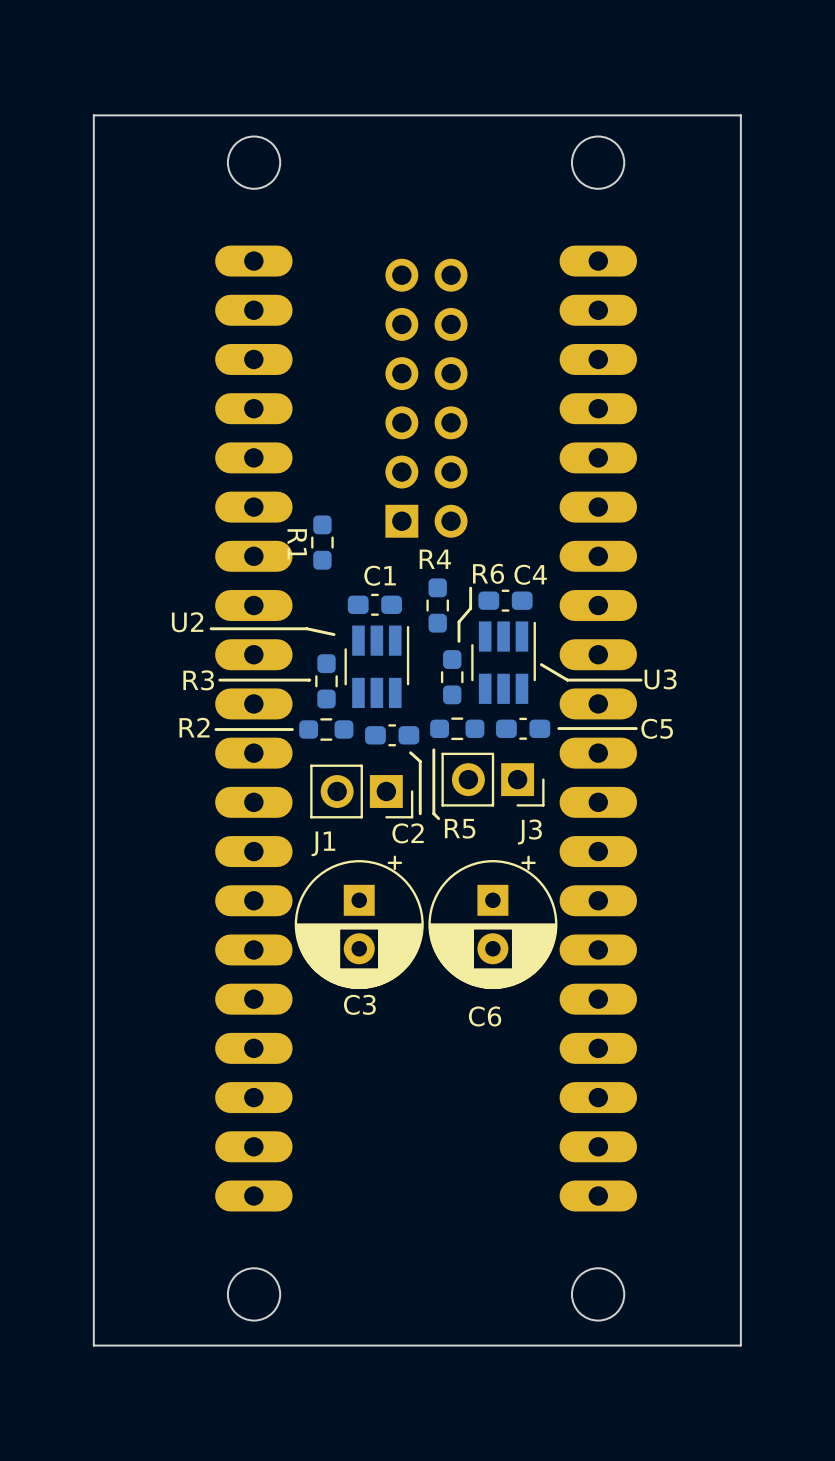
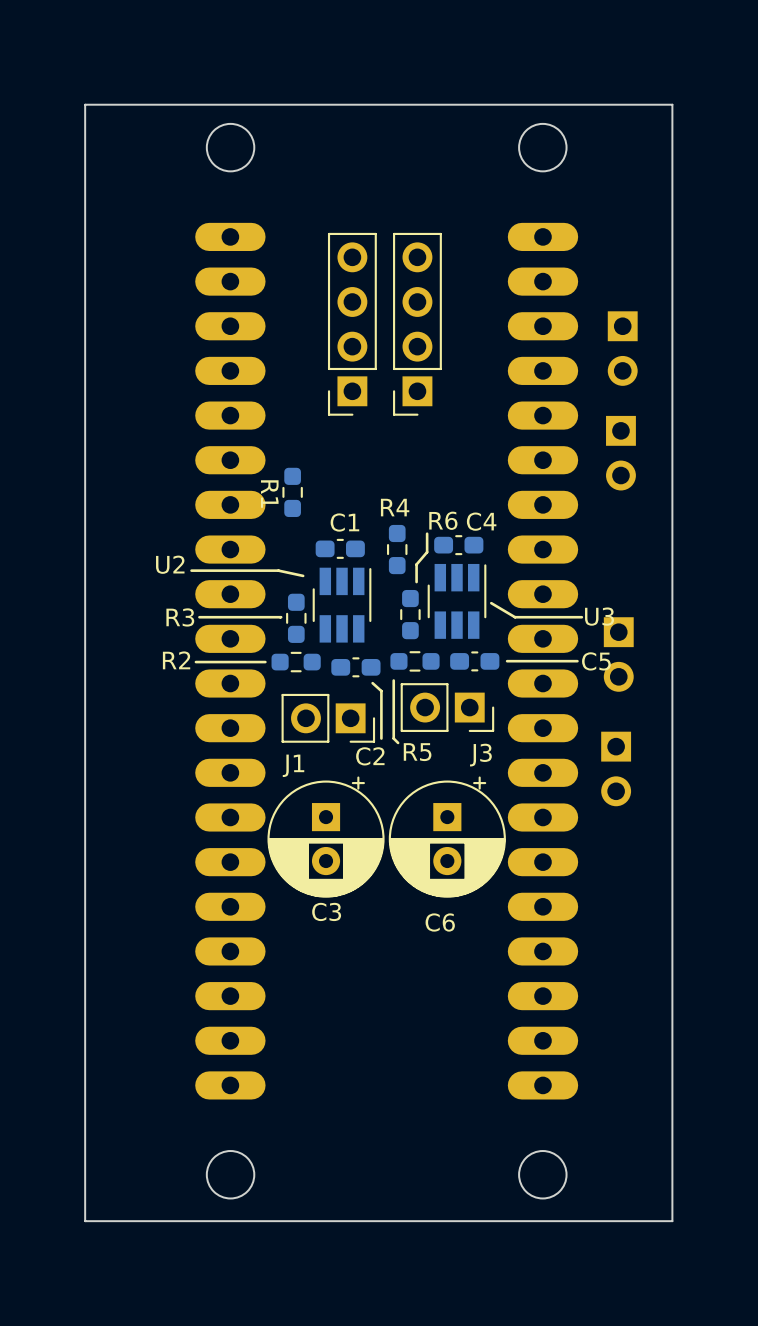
part: none -> (352, 324)
part: none -> (417, 324)
part: none -> (622, 348)
part: (426, 398) -> none
part: none -> (620, 453)
part: none -> (618, 654)
part: none -> (616, 768)

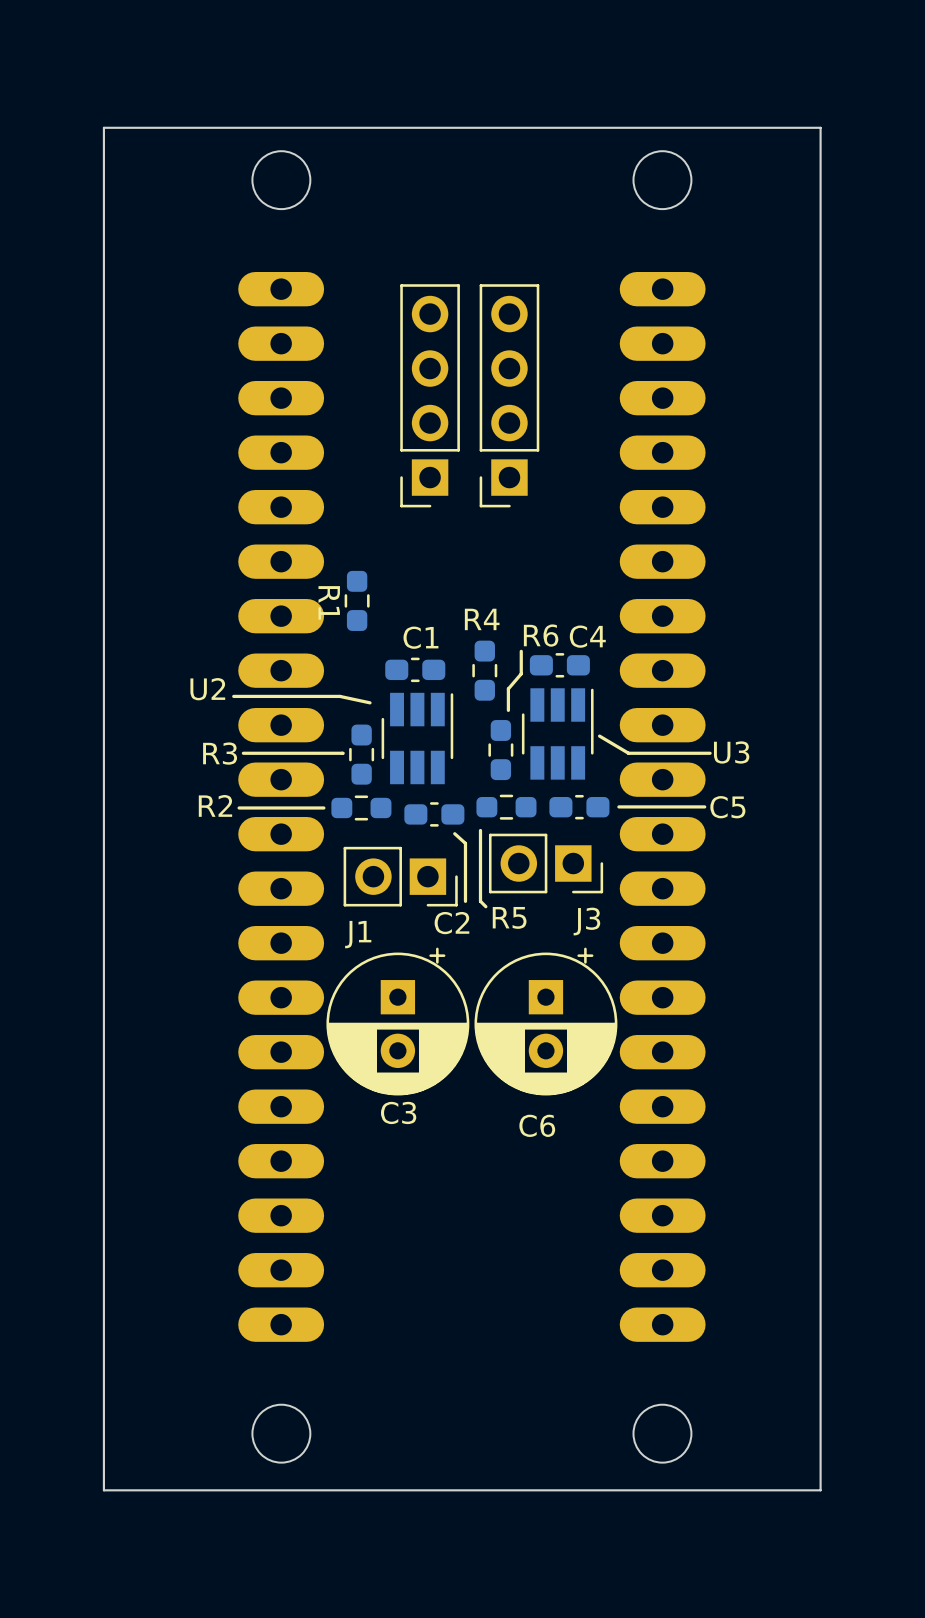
part: (622, 348) -> none
part: (620, 453) -> none
part: (618, 654) -> none
part: (616, 768) -> none

